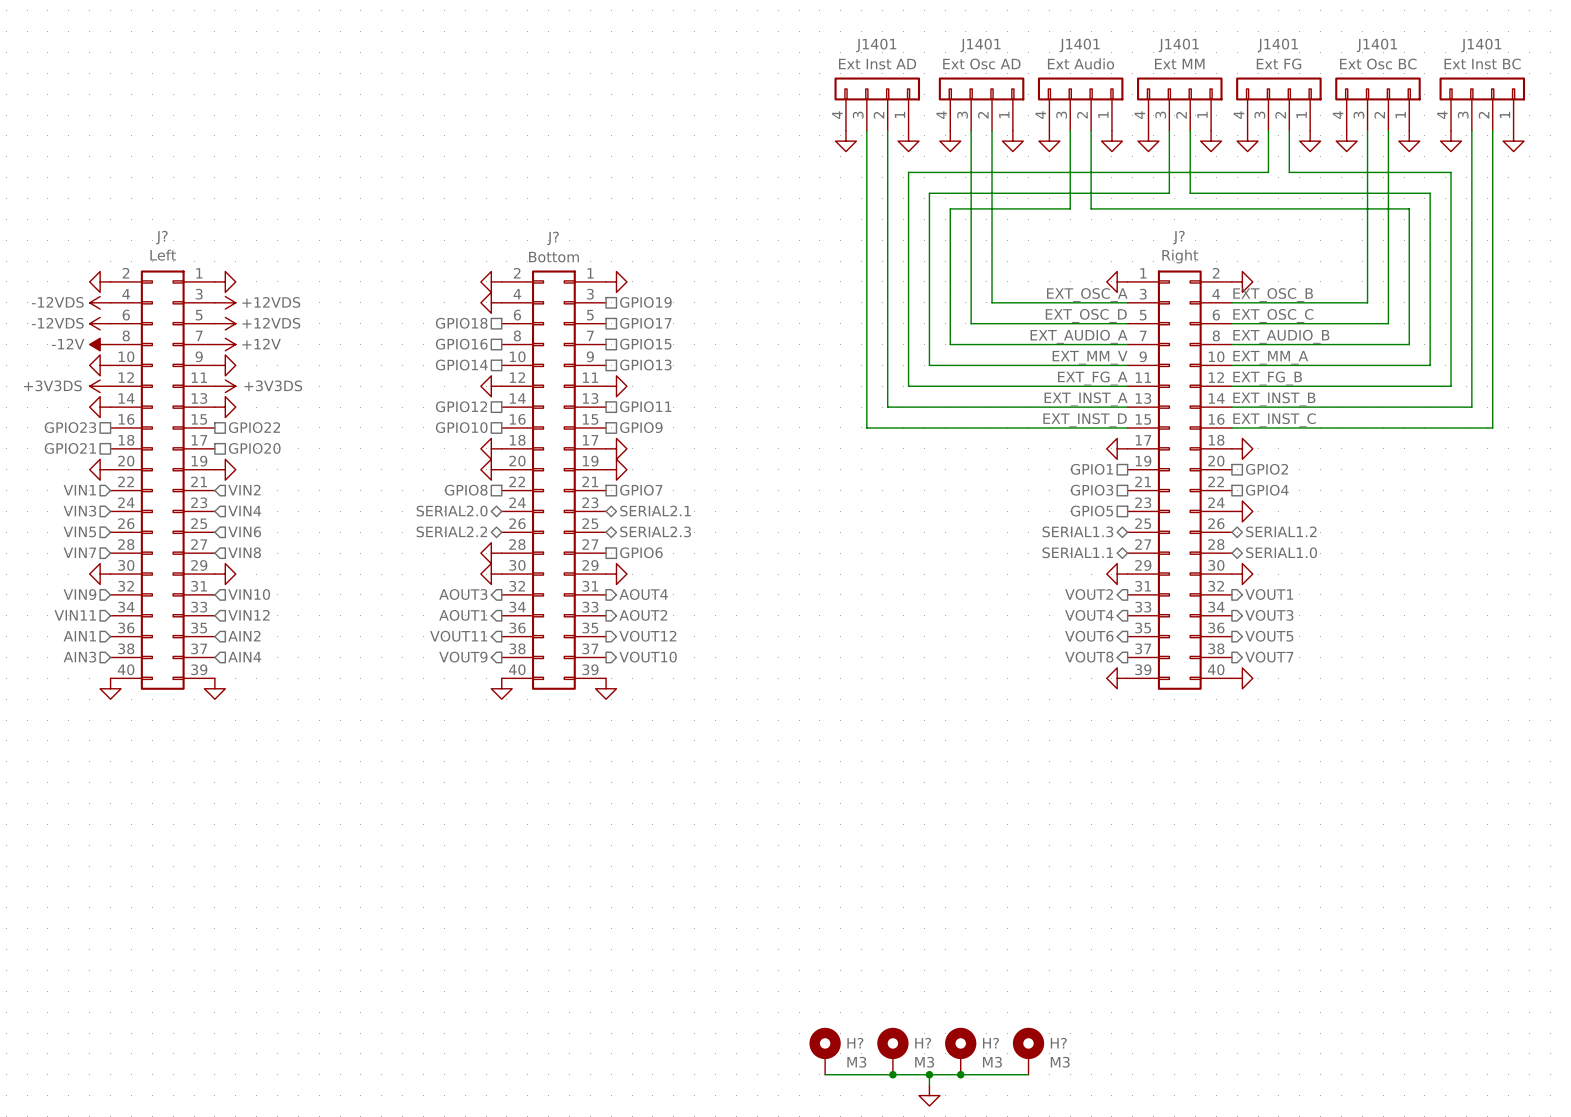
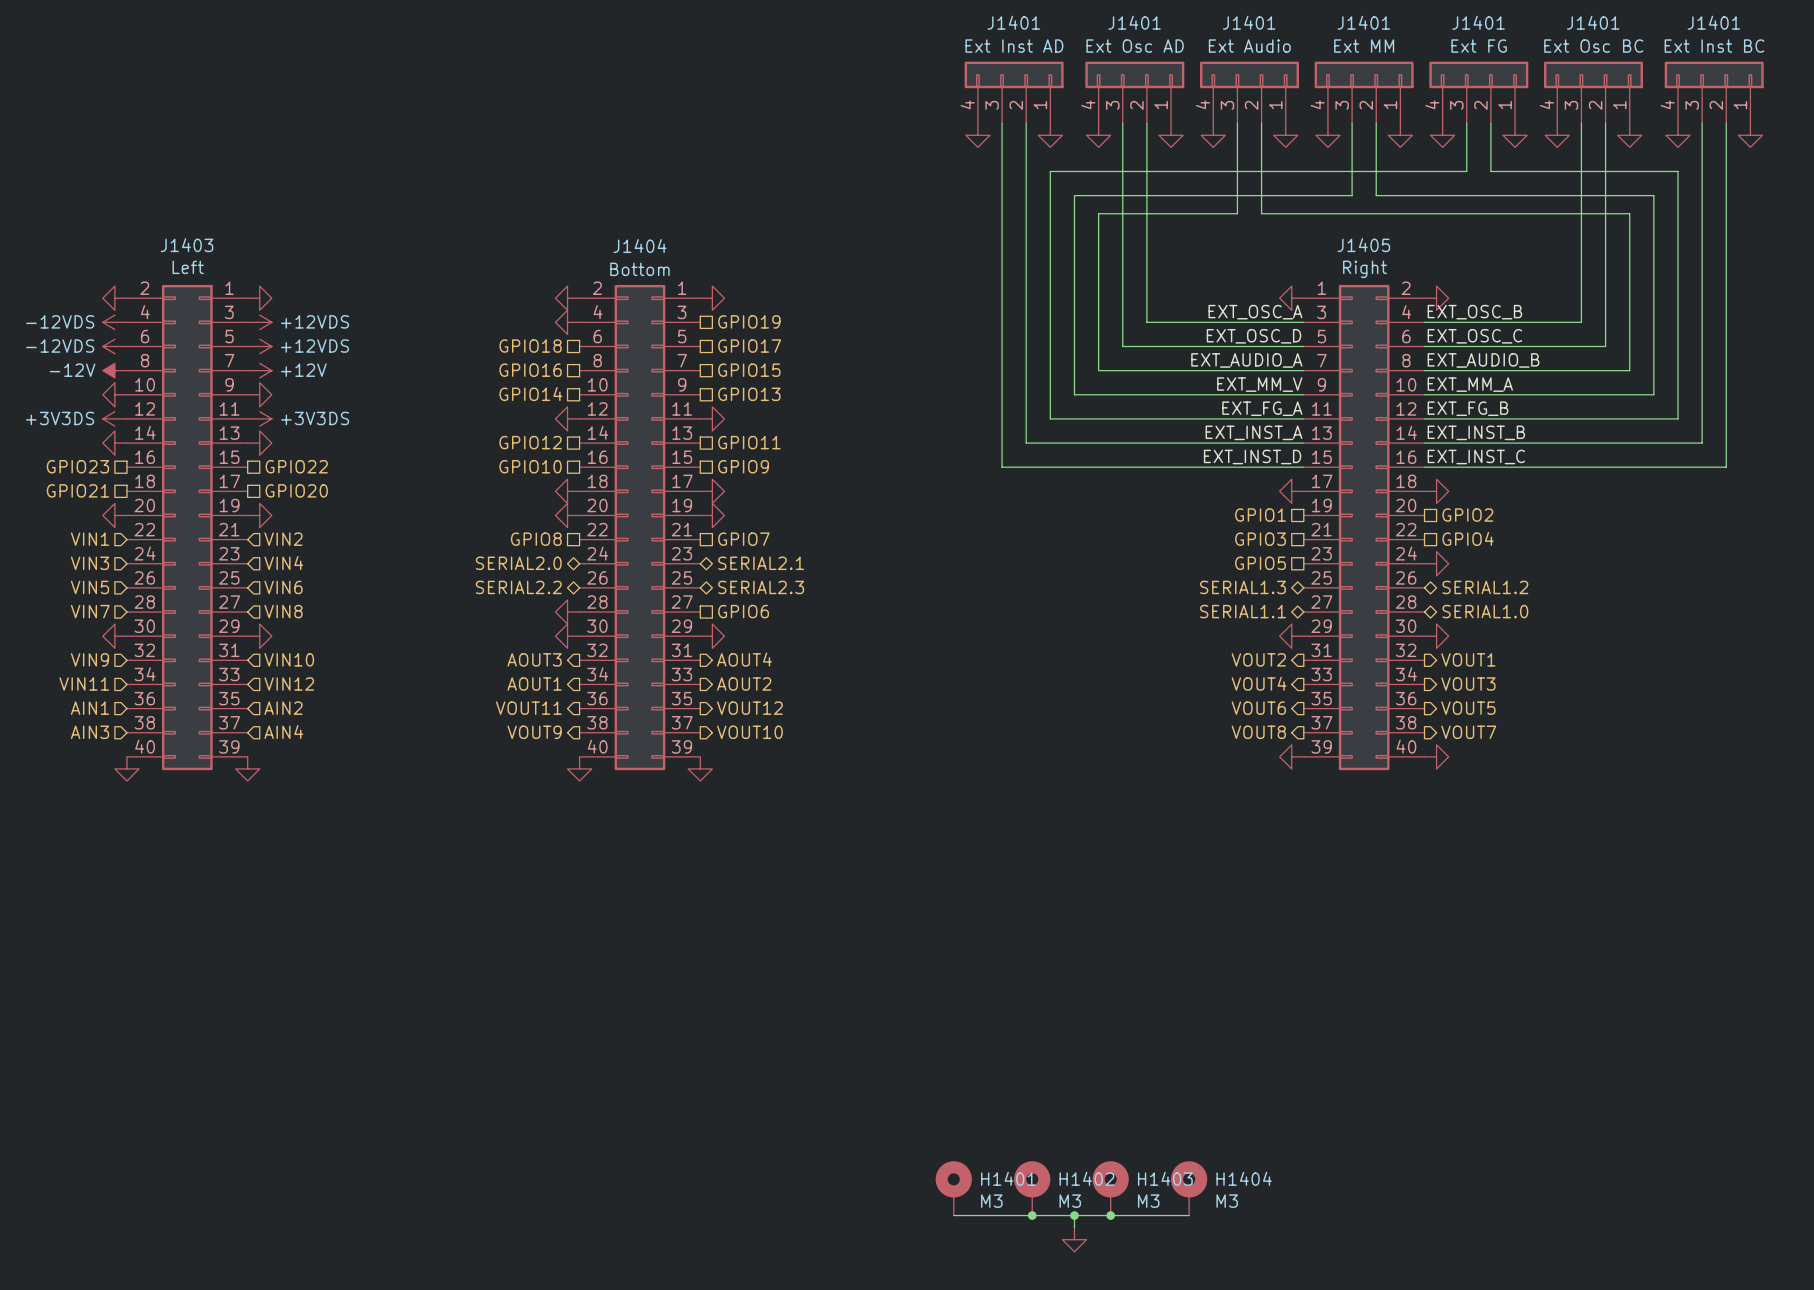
J? name: J? (161, 237) -> J1403 (187, 245)
J? name: J? (1178, 237) -> J1405 (1363, 245)
J? name: J? (553, 238) -> J1404 (639, 246)
H? name: H? (855, 1043) -> H1401 (1008, 1178)
H? name: H? (923, 1043) -> H1402 (1086, 1178)
H? name: H? (990, 1043) -> H1403 (1165, 1178)
H? name: H? (1058, 1043) -> H1404 (1244, 1178)

